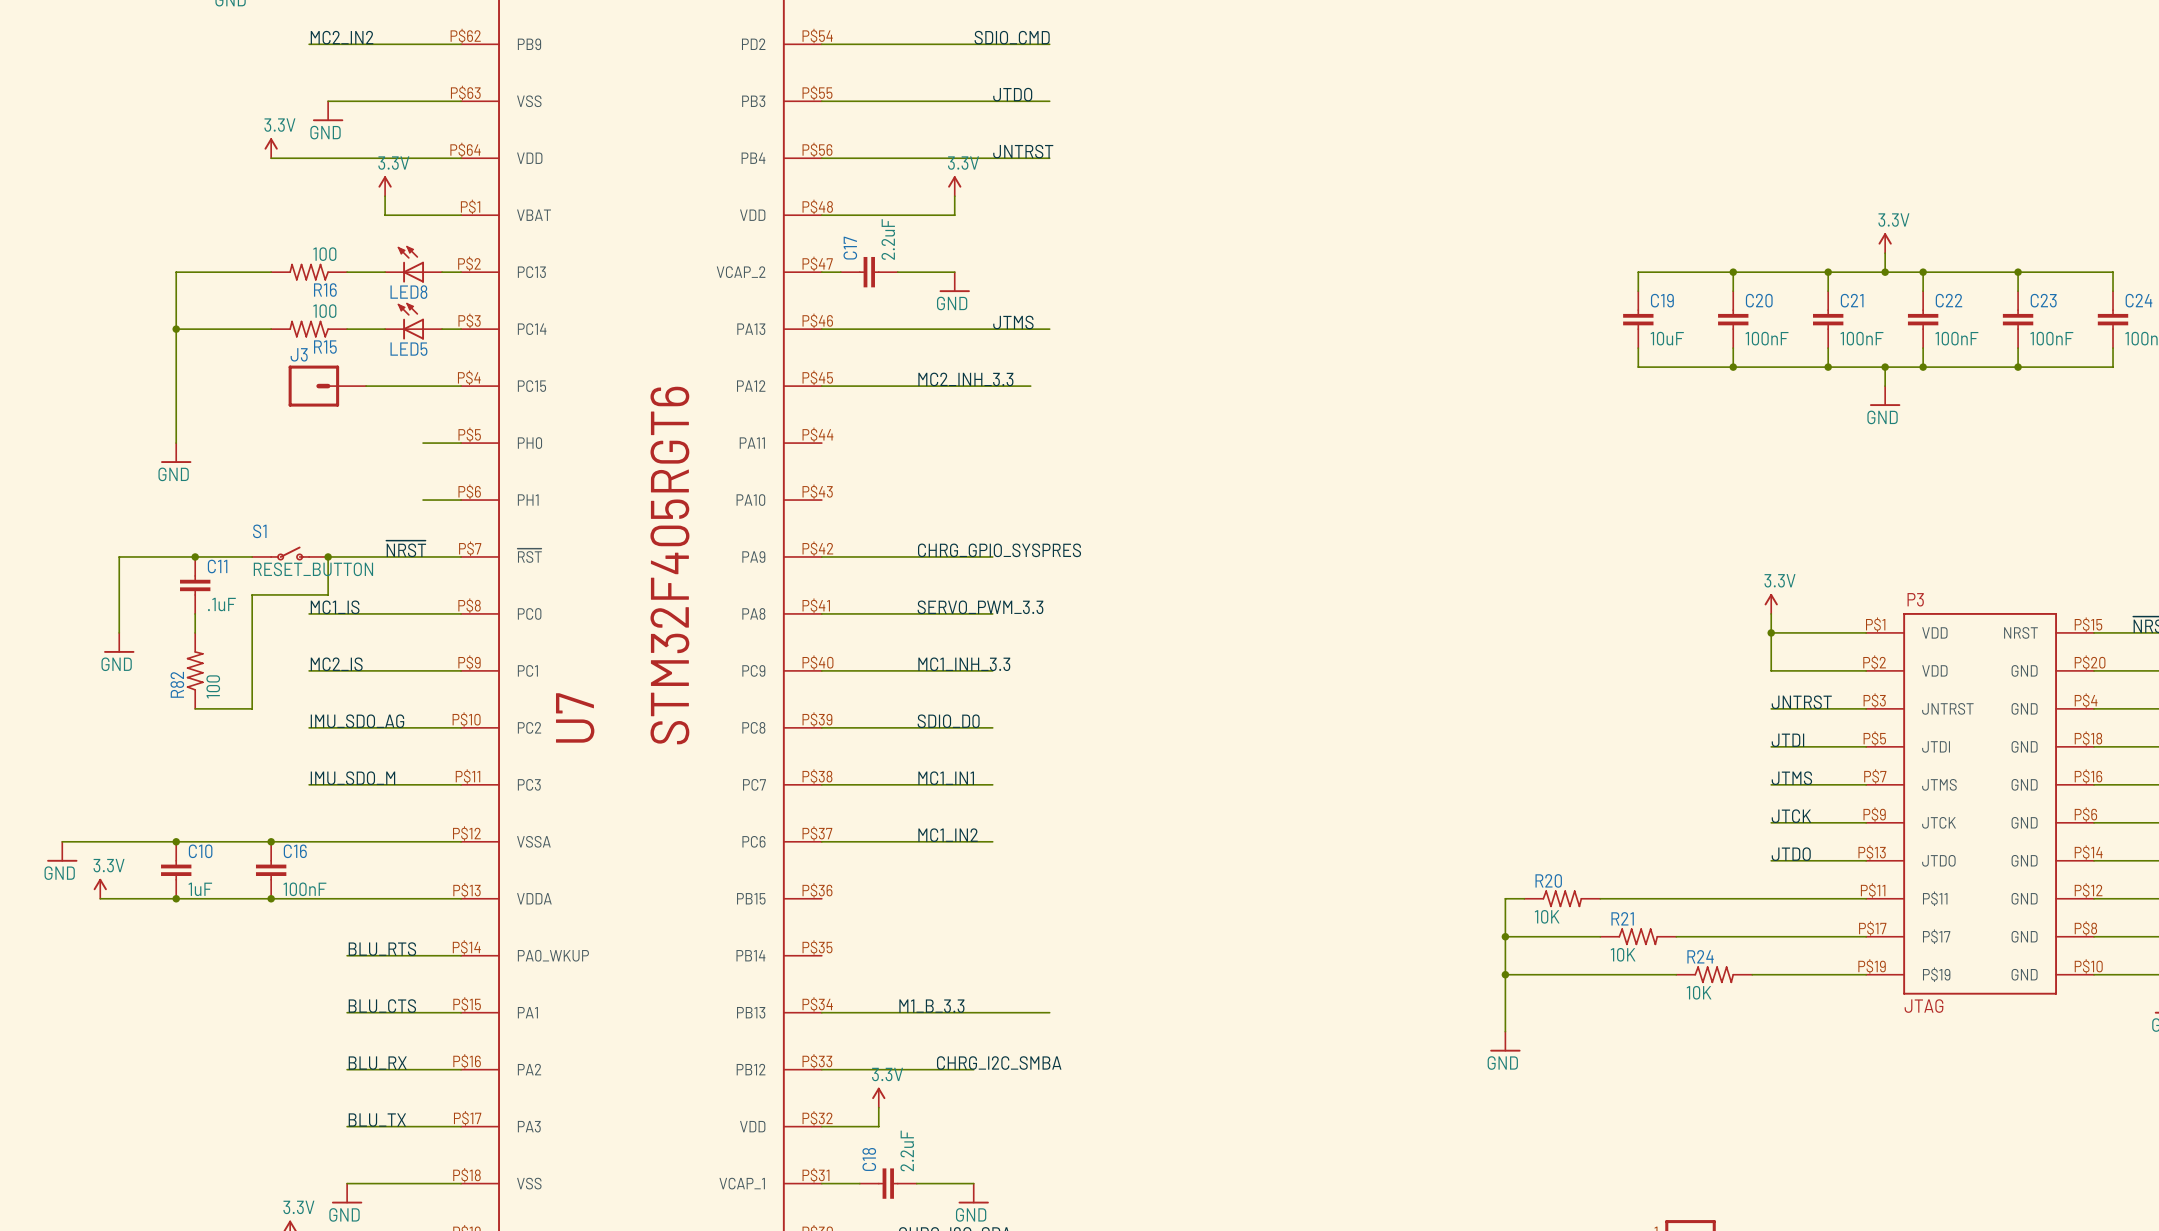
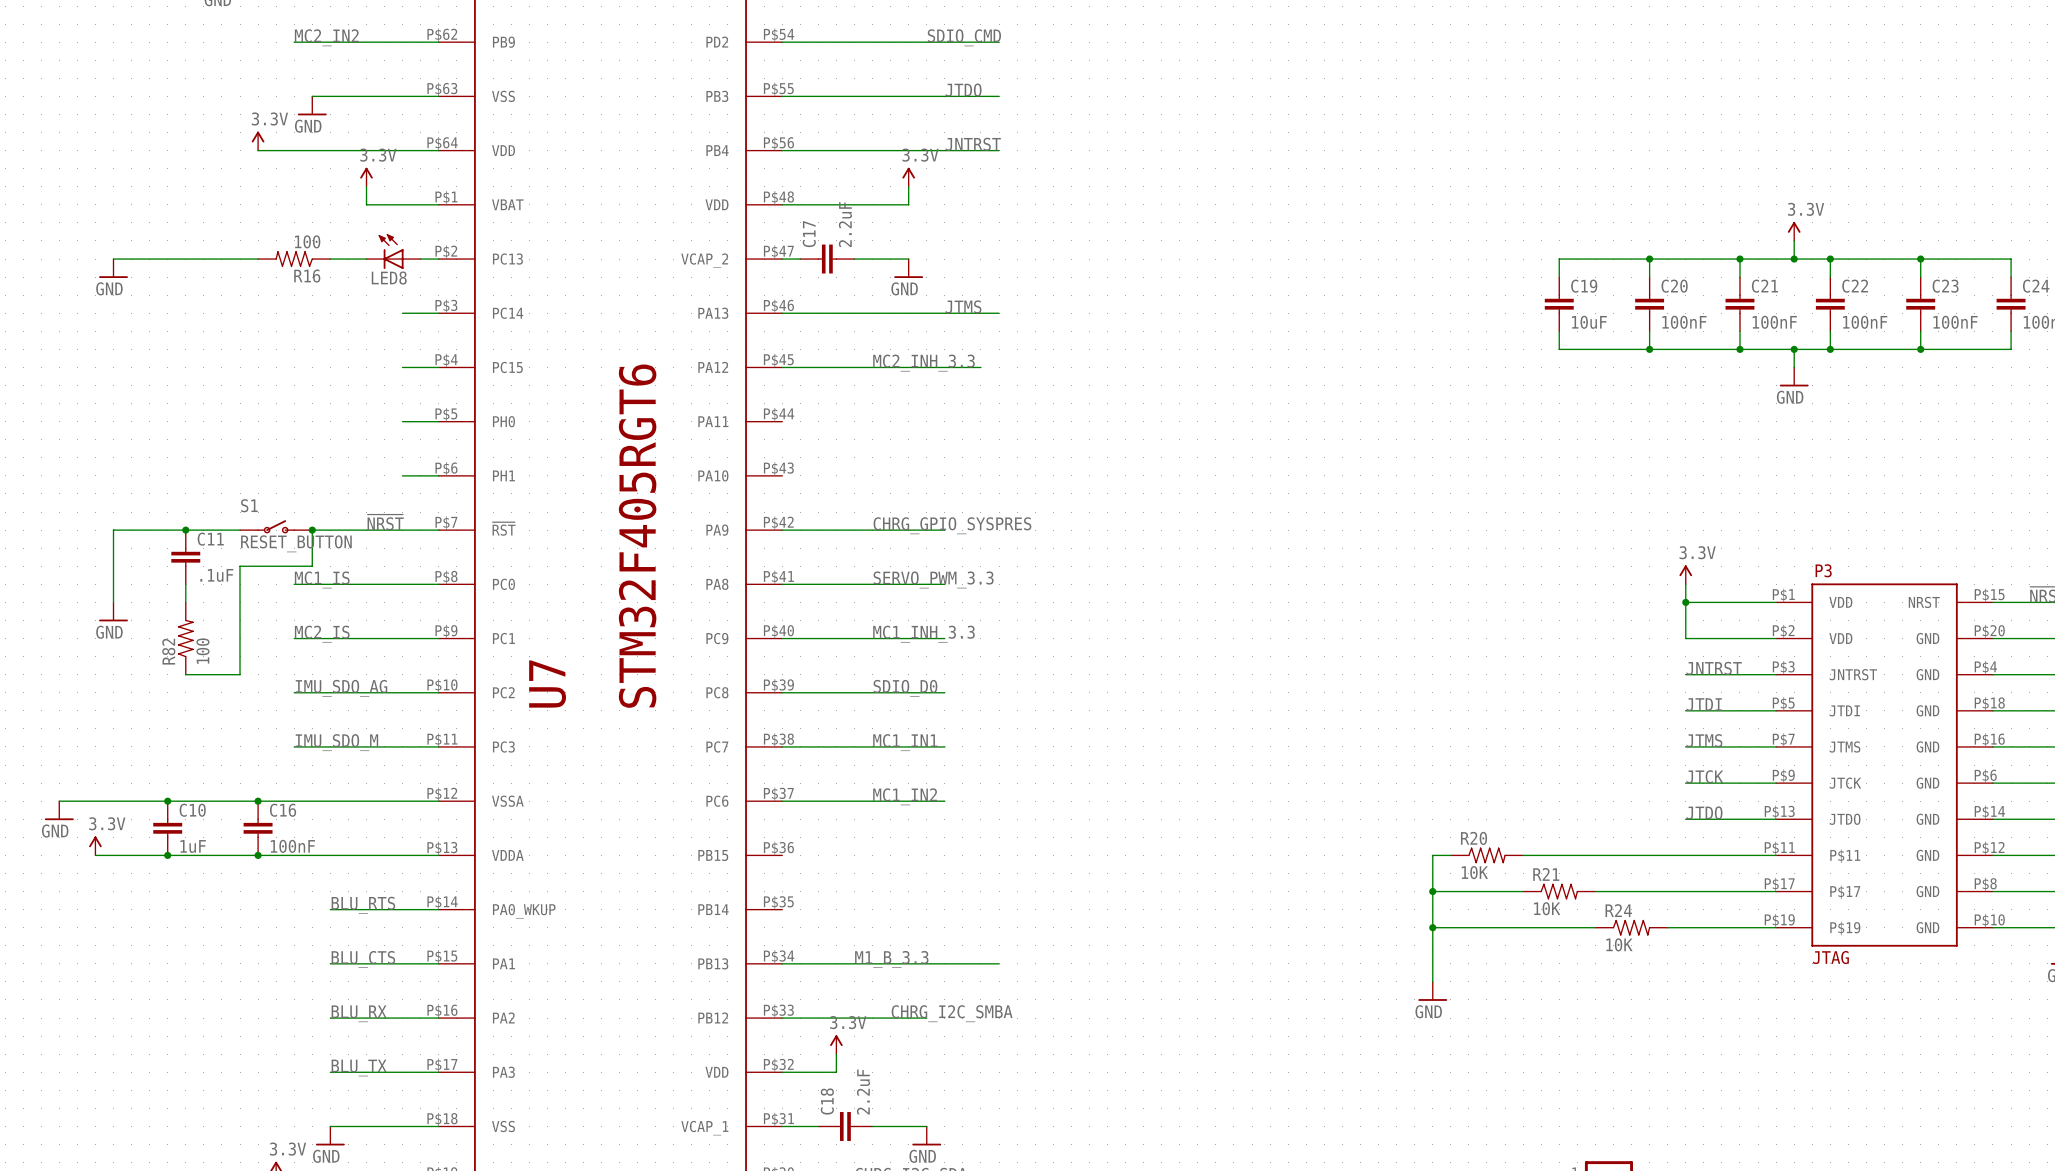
wire: (176, 272) (176, 443) -> (167, 259) (113, 259)
LED5: (413, 321) -> none
wire: (176, 329) (271, 329) -> none
junction: (176, 329) -> none
R15: 100 (309, 329) -> none
wire: (347, 329) (385, 329) -> none
J3: (327, 386) -> none
wire: (366, 386) (423, 386) -> none
power symbol position: GND (176, 453) -> GND (113, 268)

